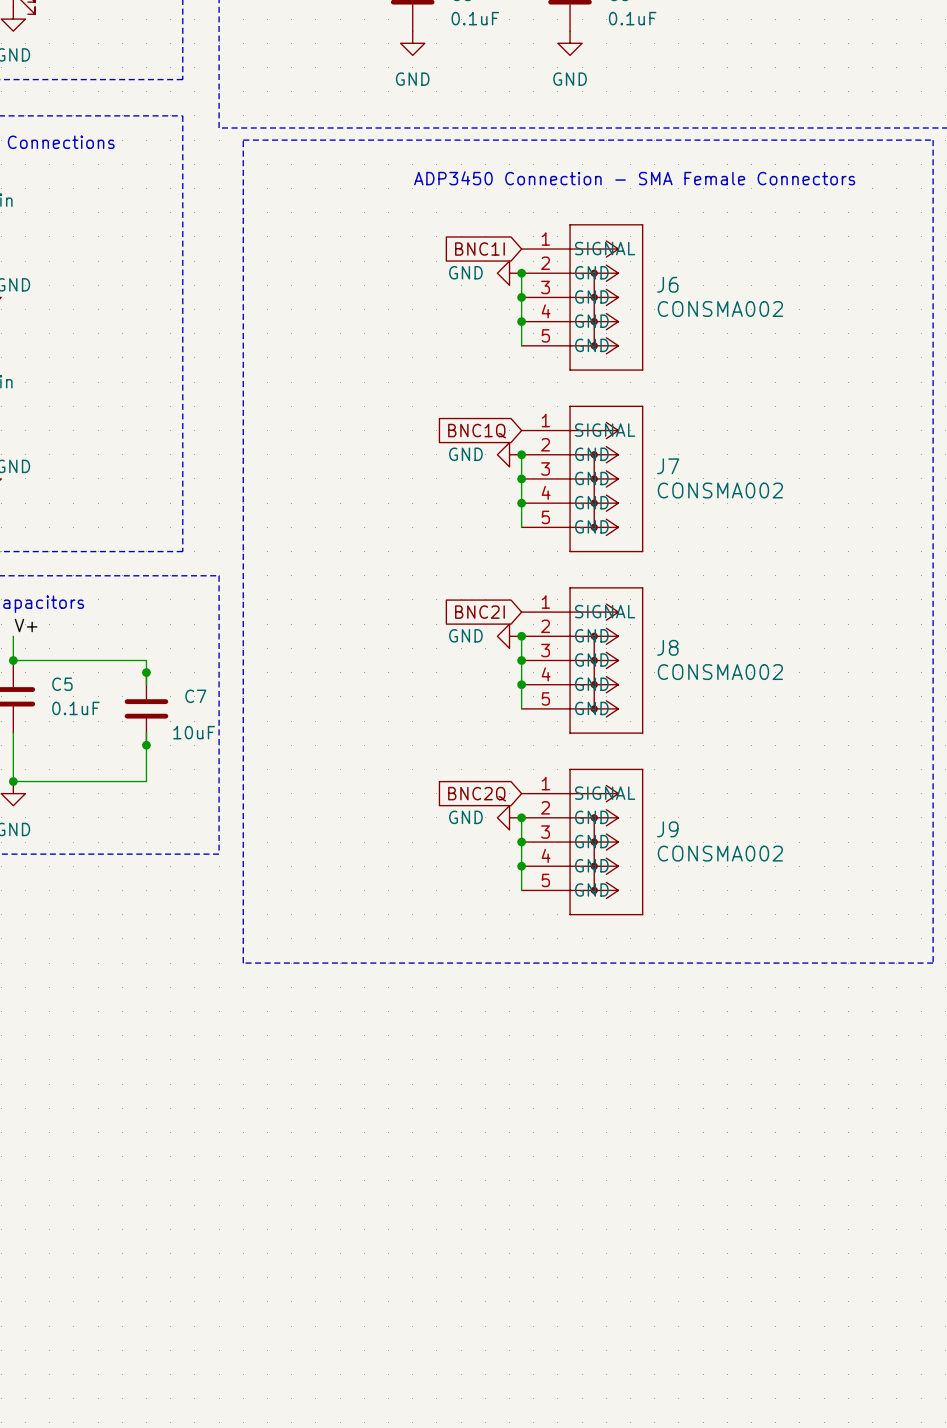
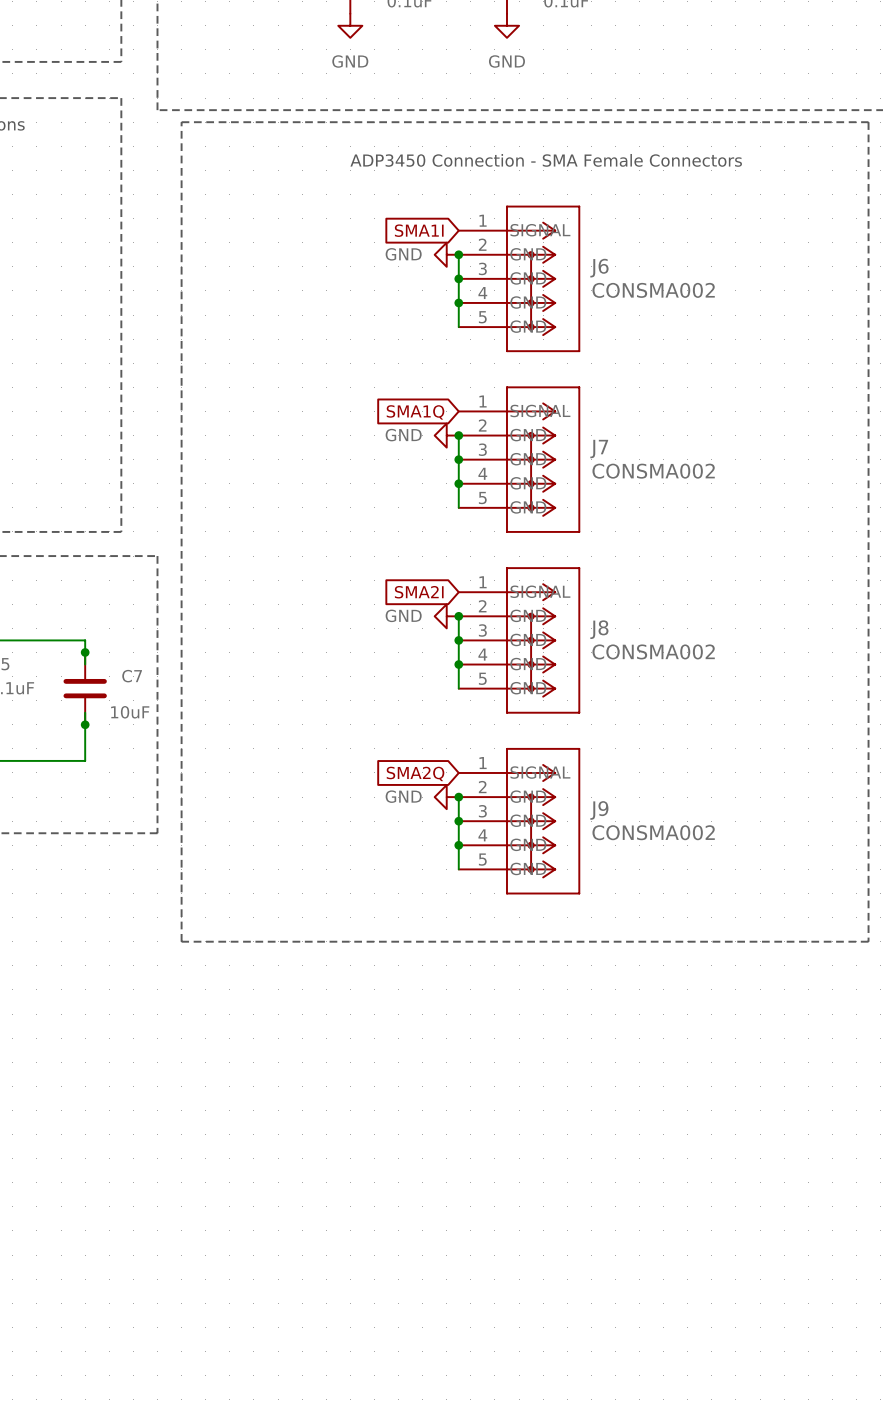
global label: BNC1I (479, 249) -> SMA1I (419, 230)
global label: BNC1Q (477, 431) -> SMA1Q (415, 412)
global label: BNC2I (479, 612) -> SMA2I (419, 592)
global label: BNC2Q (477, 794) -> SMA2Q (415, 773)

